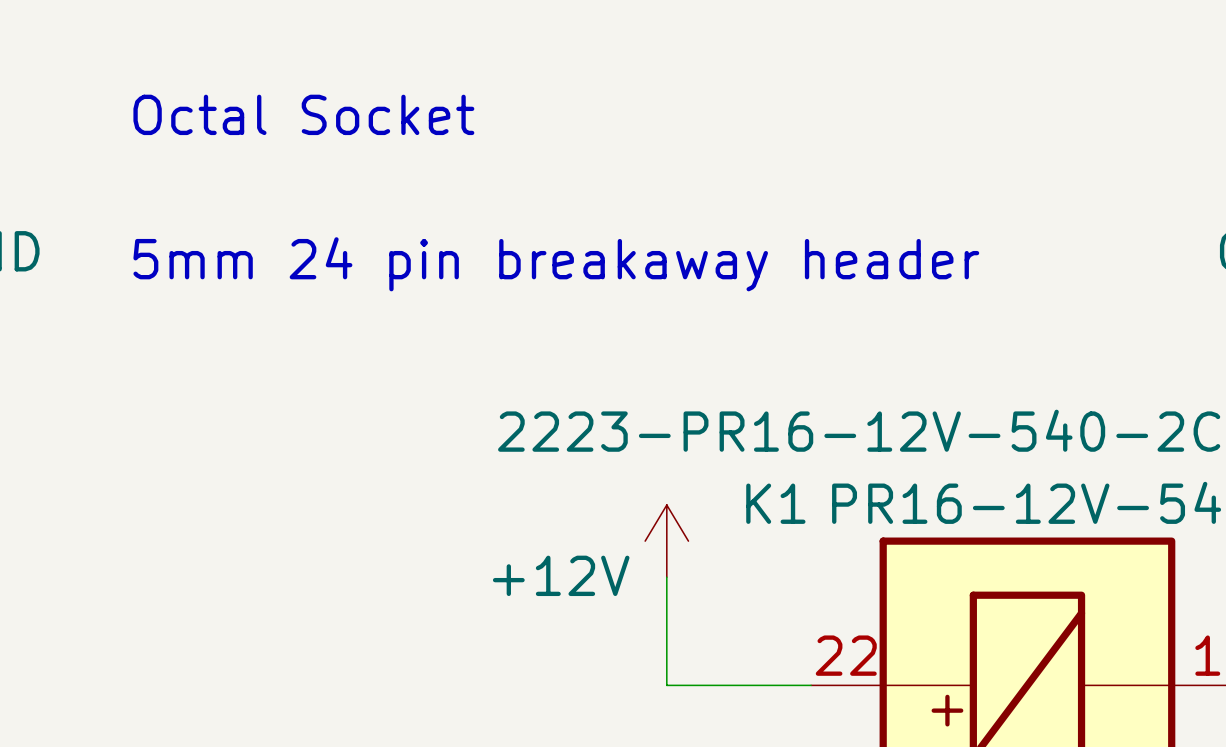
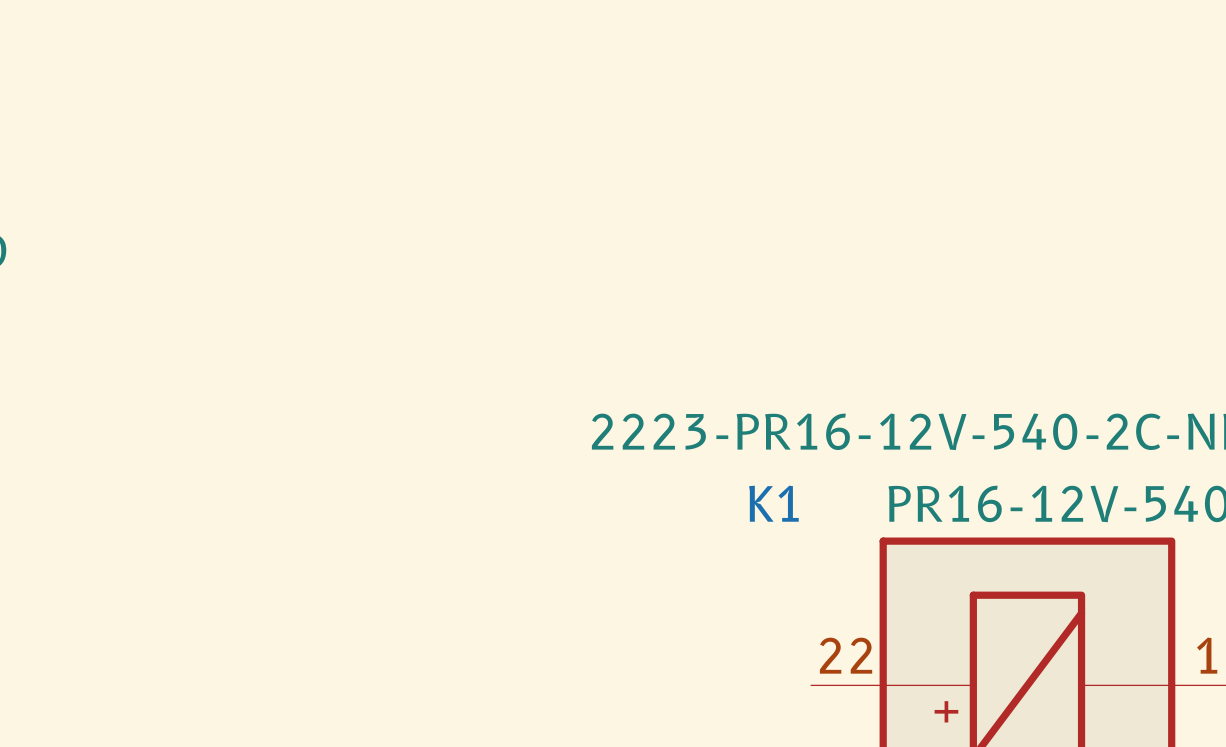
text: Octal Socket (303, 114) -> none
text: 5mm 24 pin breakaway header (556, 264) -> none
power symbol: +12V (666, 541) -> none
wire: (666, 577) (666, 685) (811, 685) -> none

